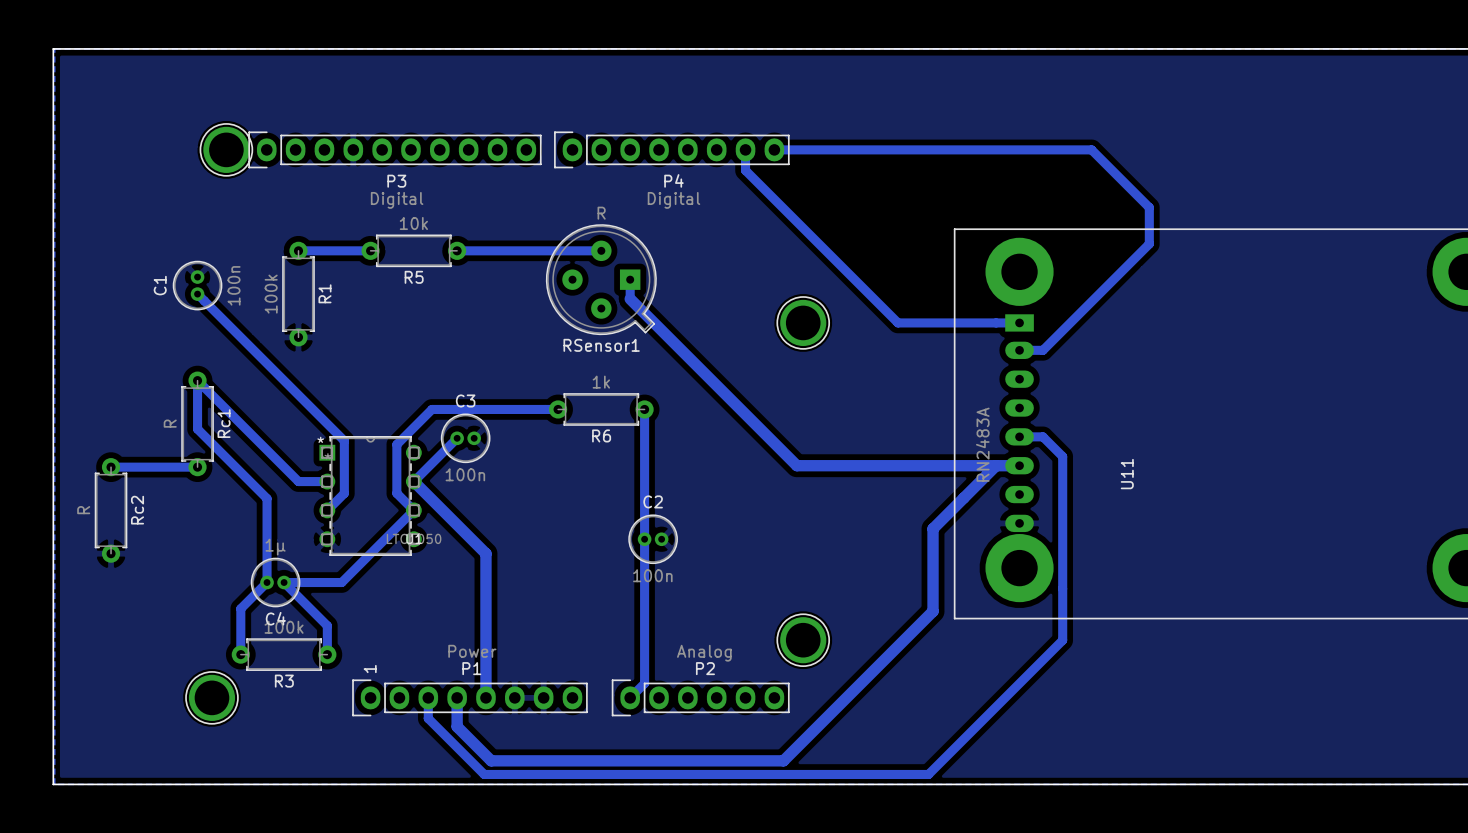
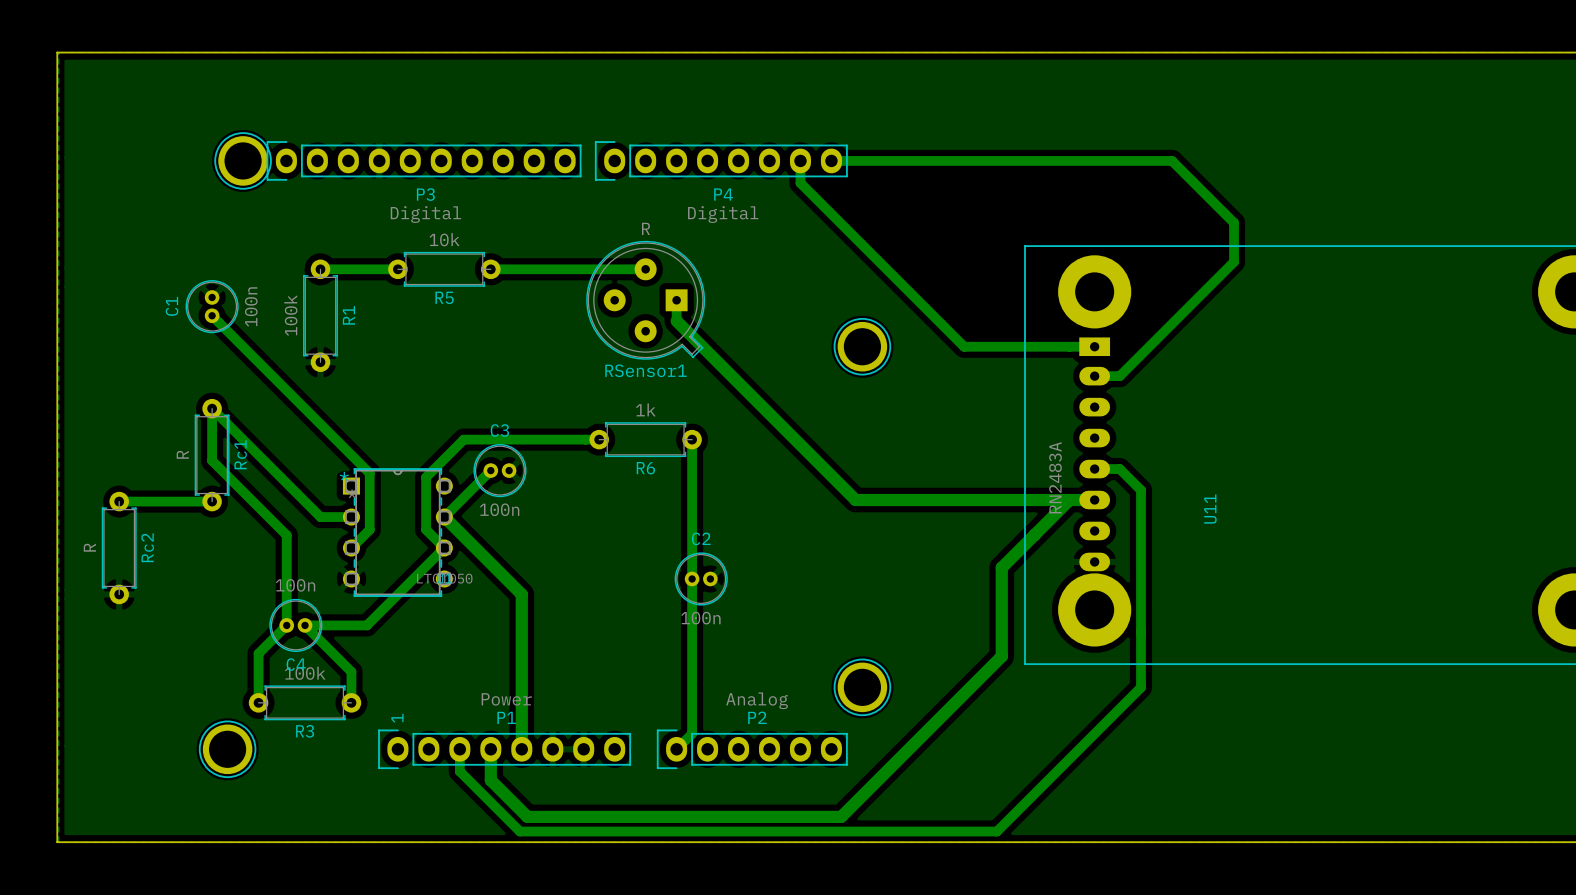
C4 value: 1μ (275, 547) -> 100n (295, 585)

